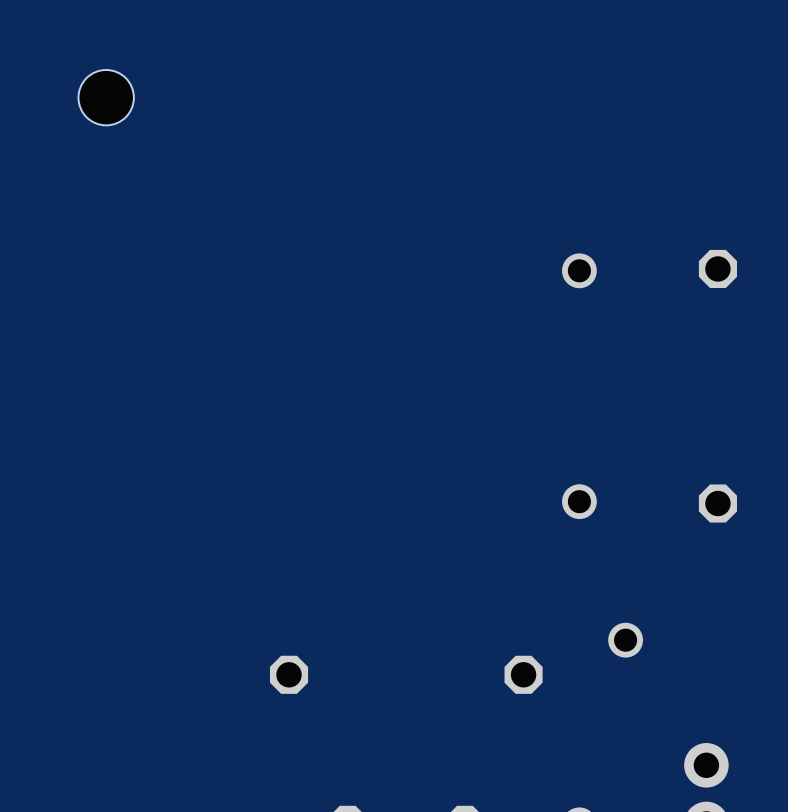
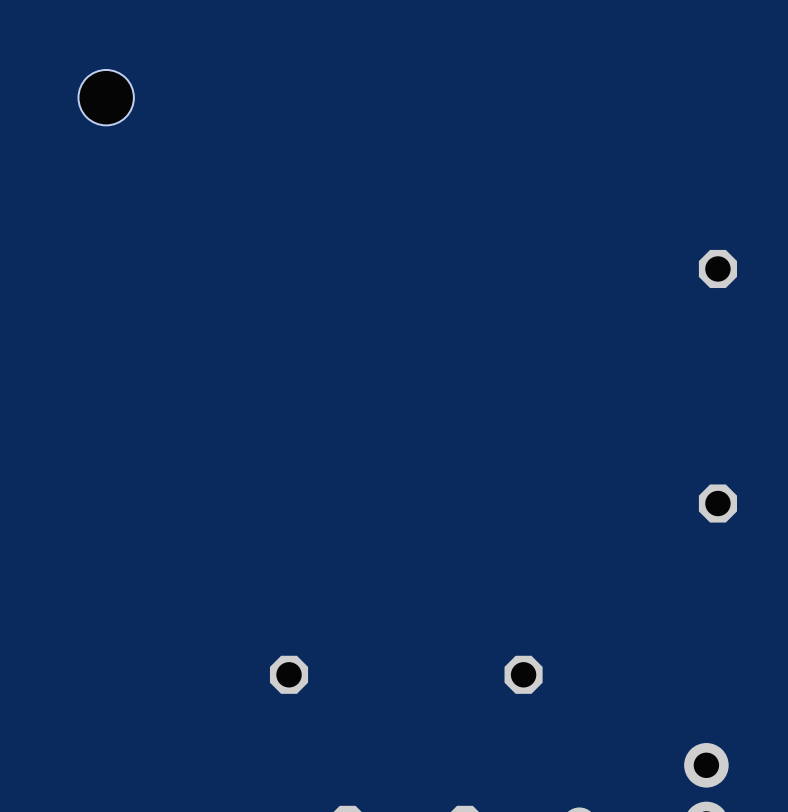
part: (579, 270) -> none
part: (579, 501) -> none
part: (625, 640) -> none

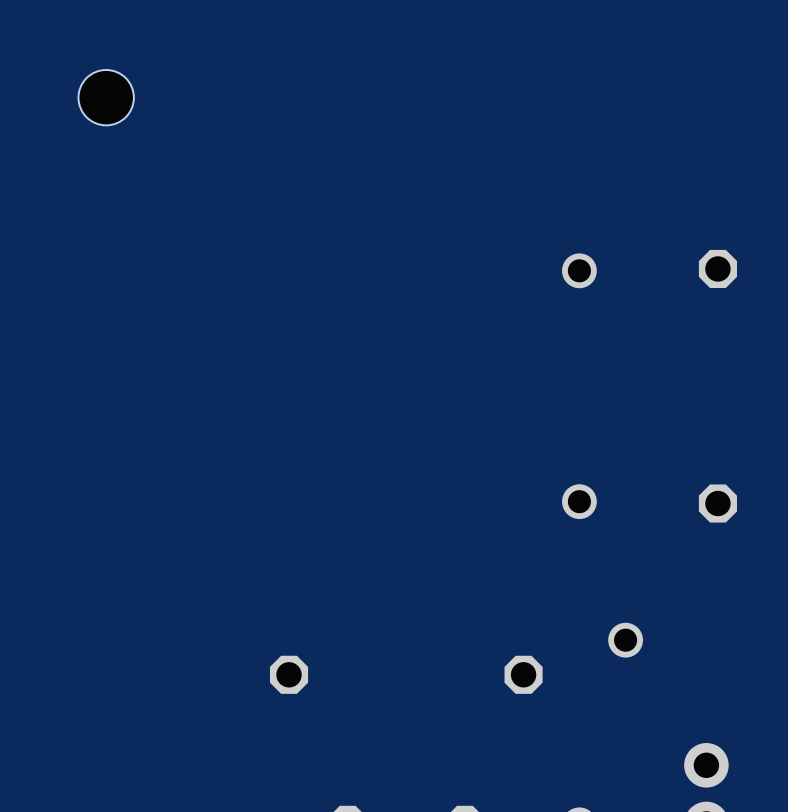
part: none -> (579, 270)
part: none -> (579, 501)
part: none -> (625, 640)

